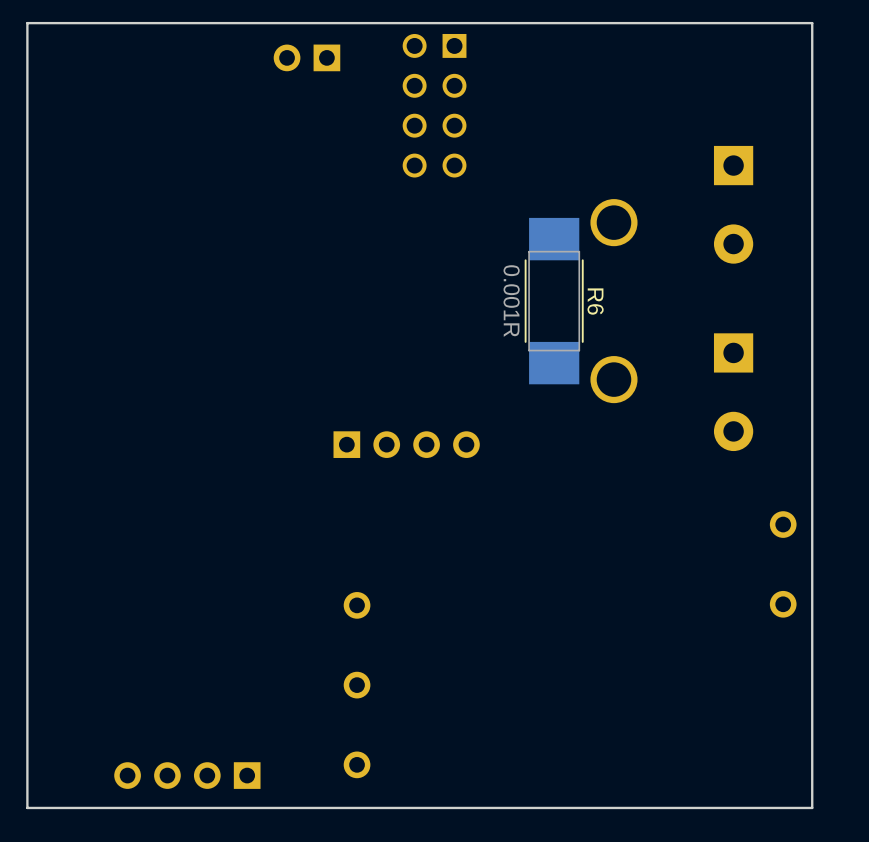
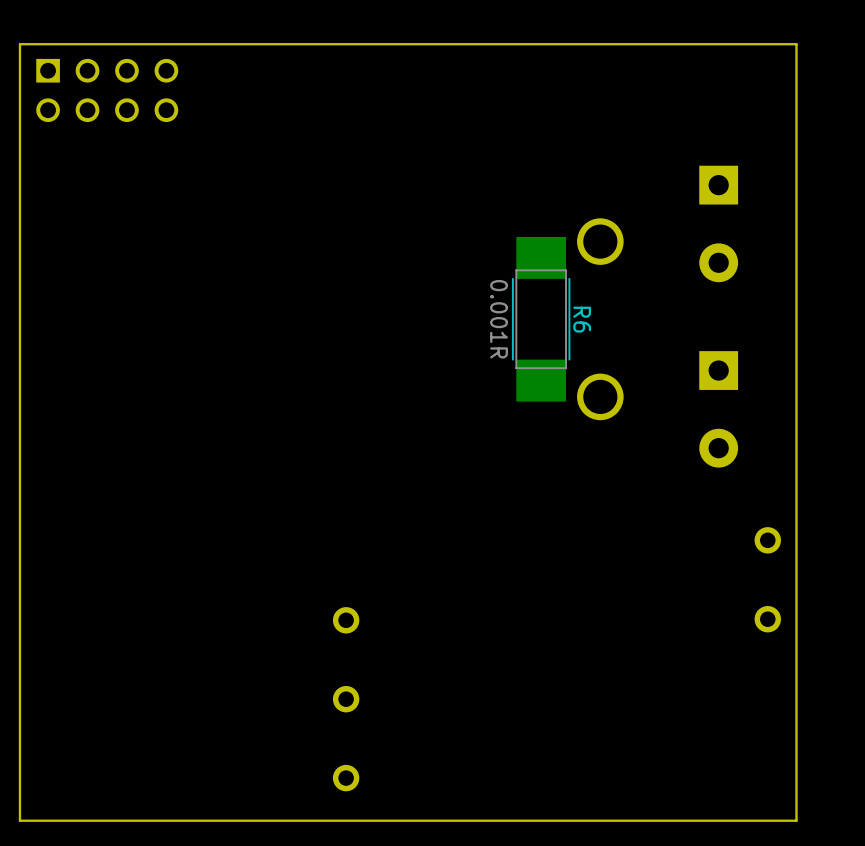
part: (306, 57) -> none
part rotation: 0° (434, 105) -> 90° counterclockwise (107, 90)
part position: (434, 105) -> (107, 90)
part: (406, 444) -> none
part: (187, 775) -> none

